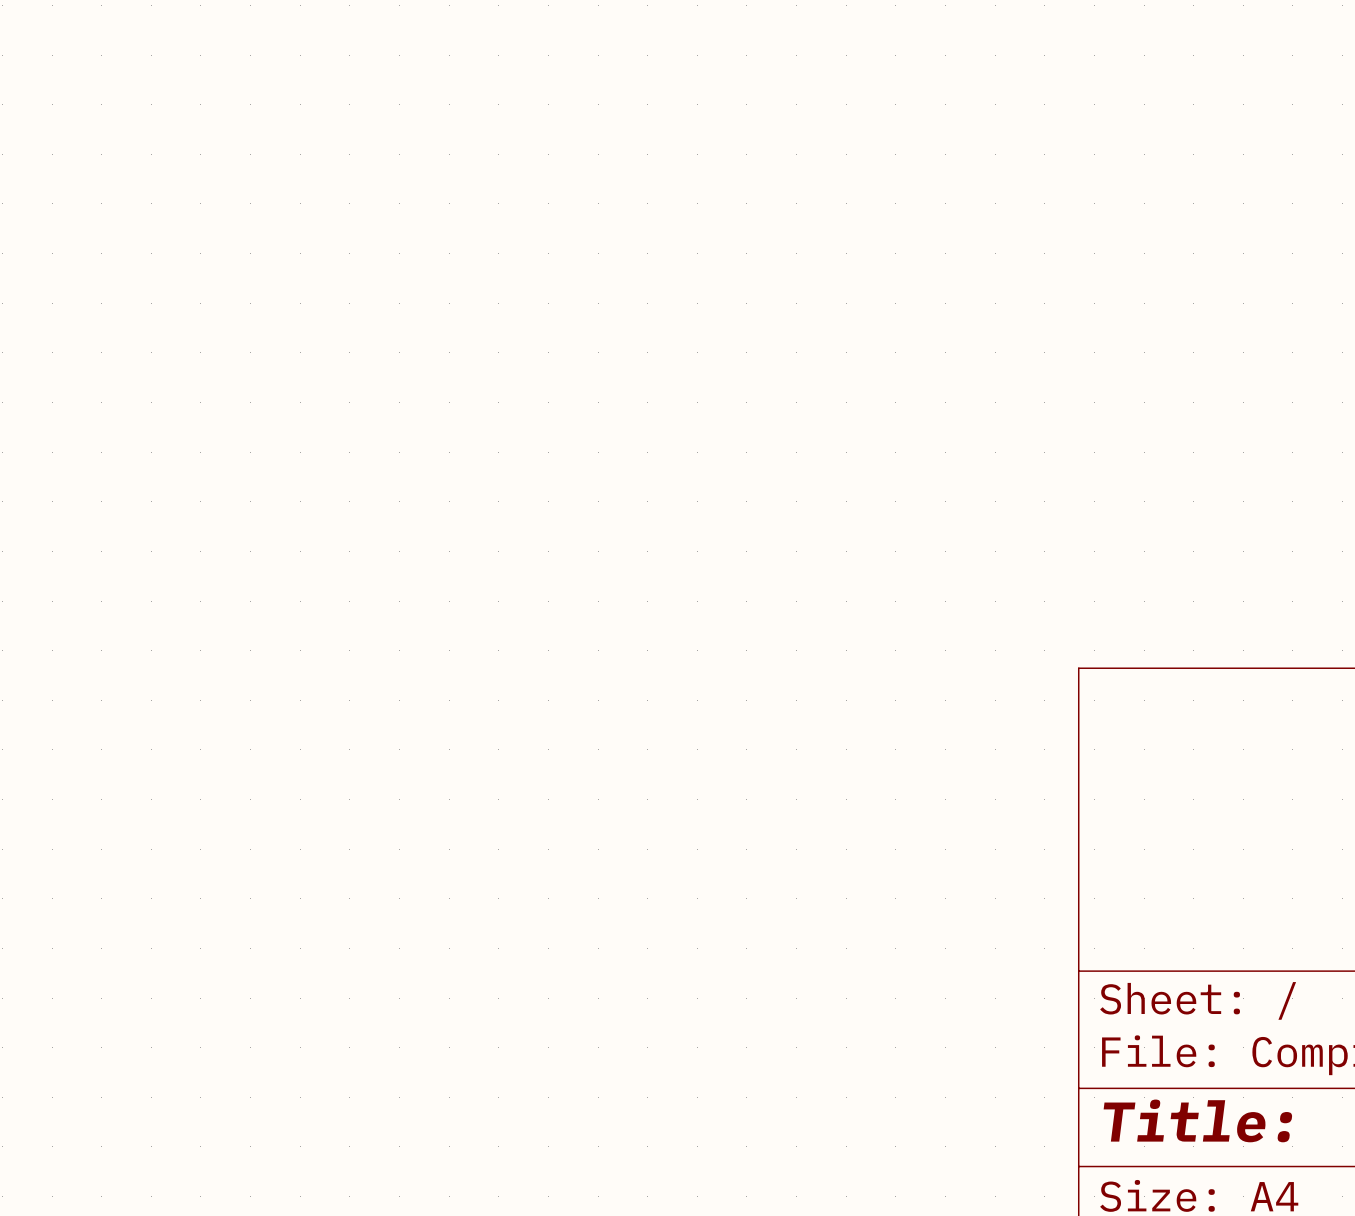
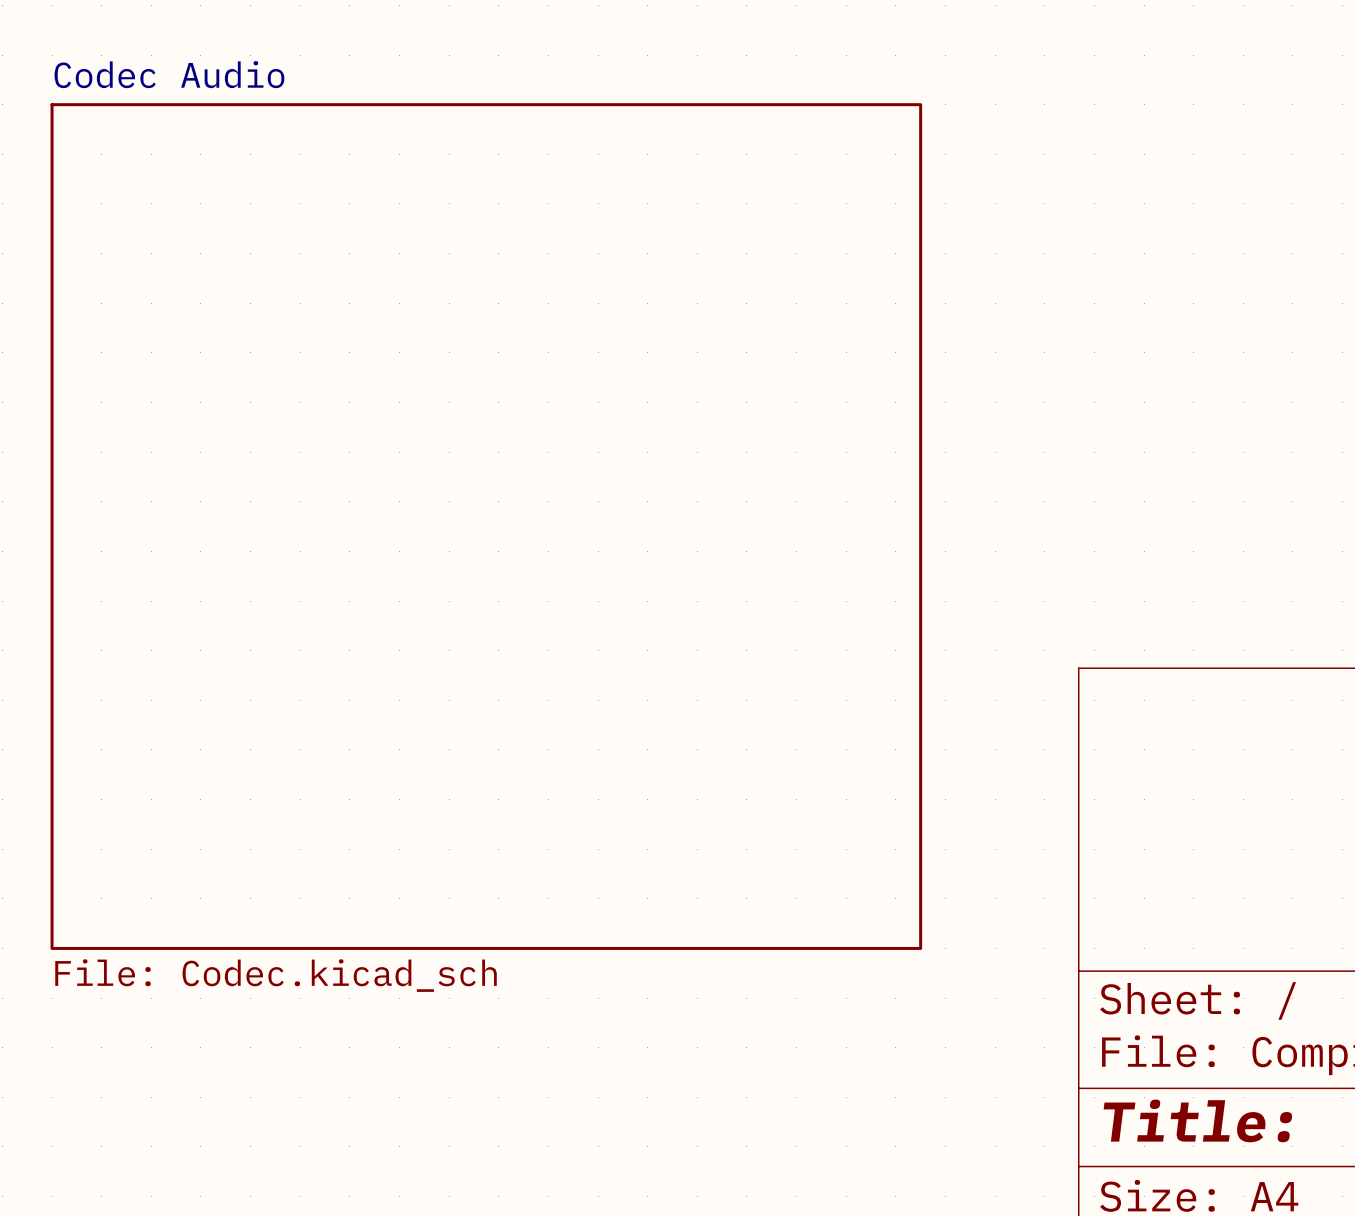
sheet Codec Audio: none -> File: Codec.kicad_sch (486, 526)

